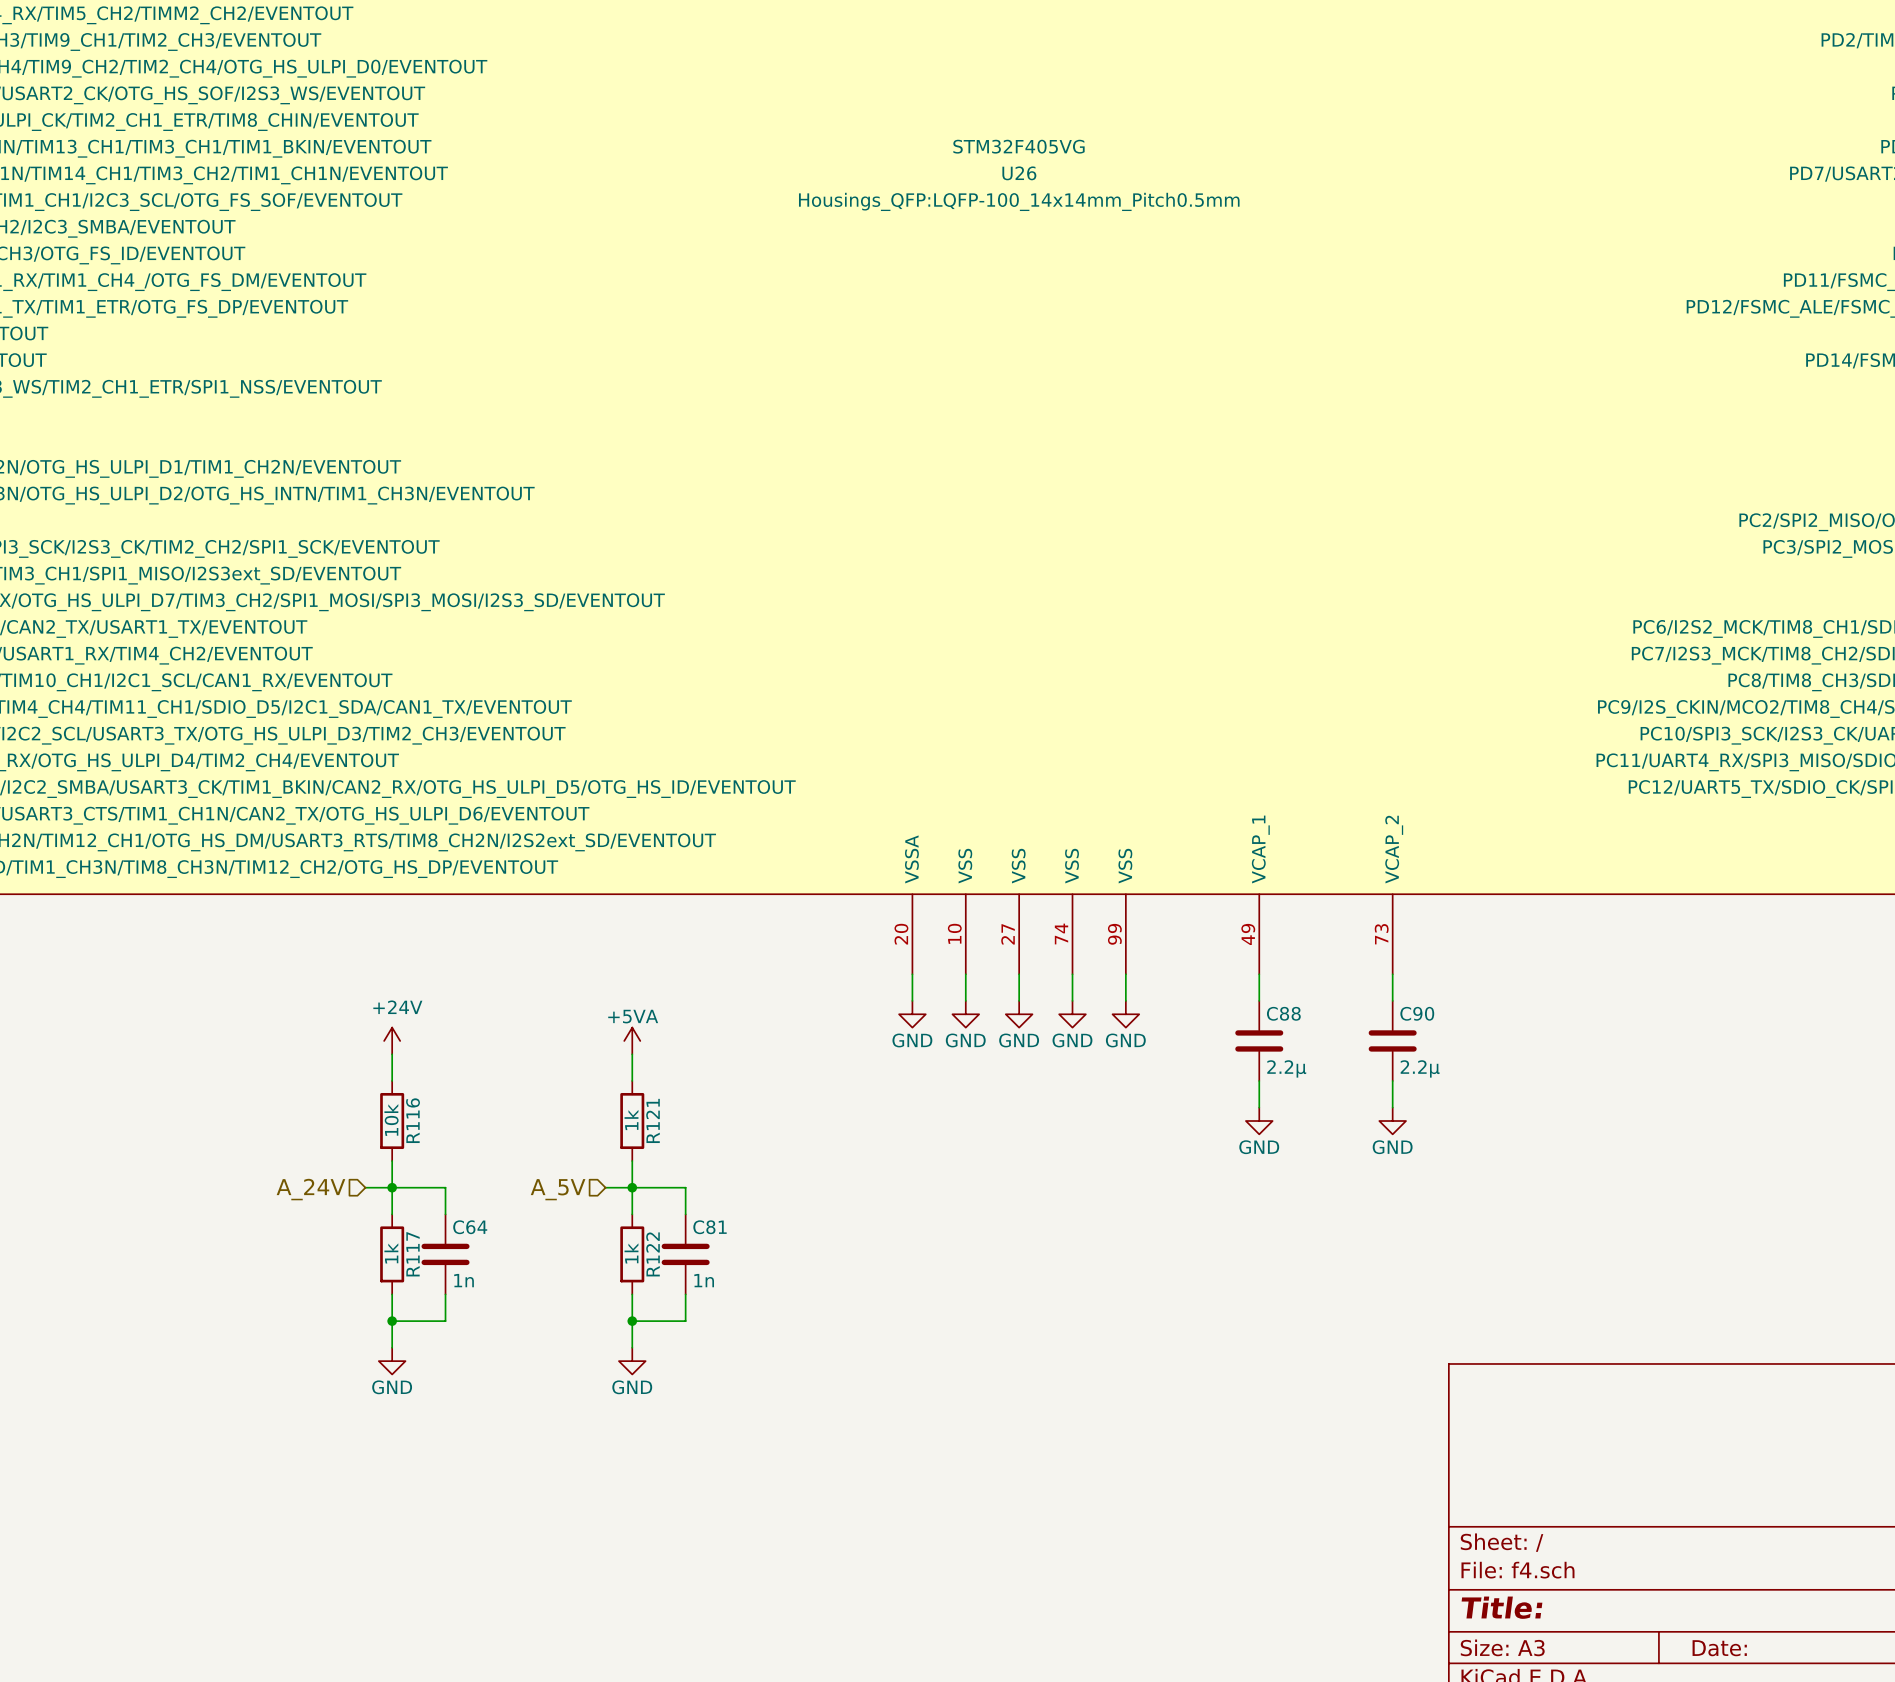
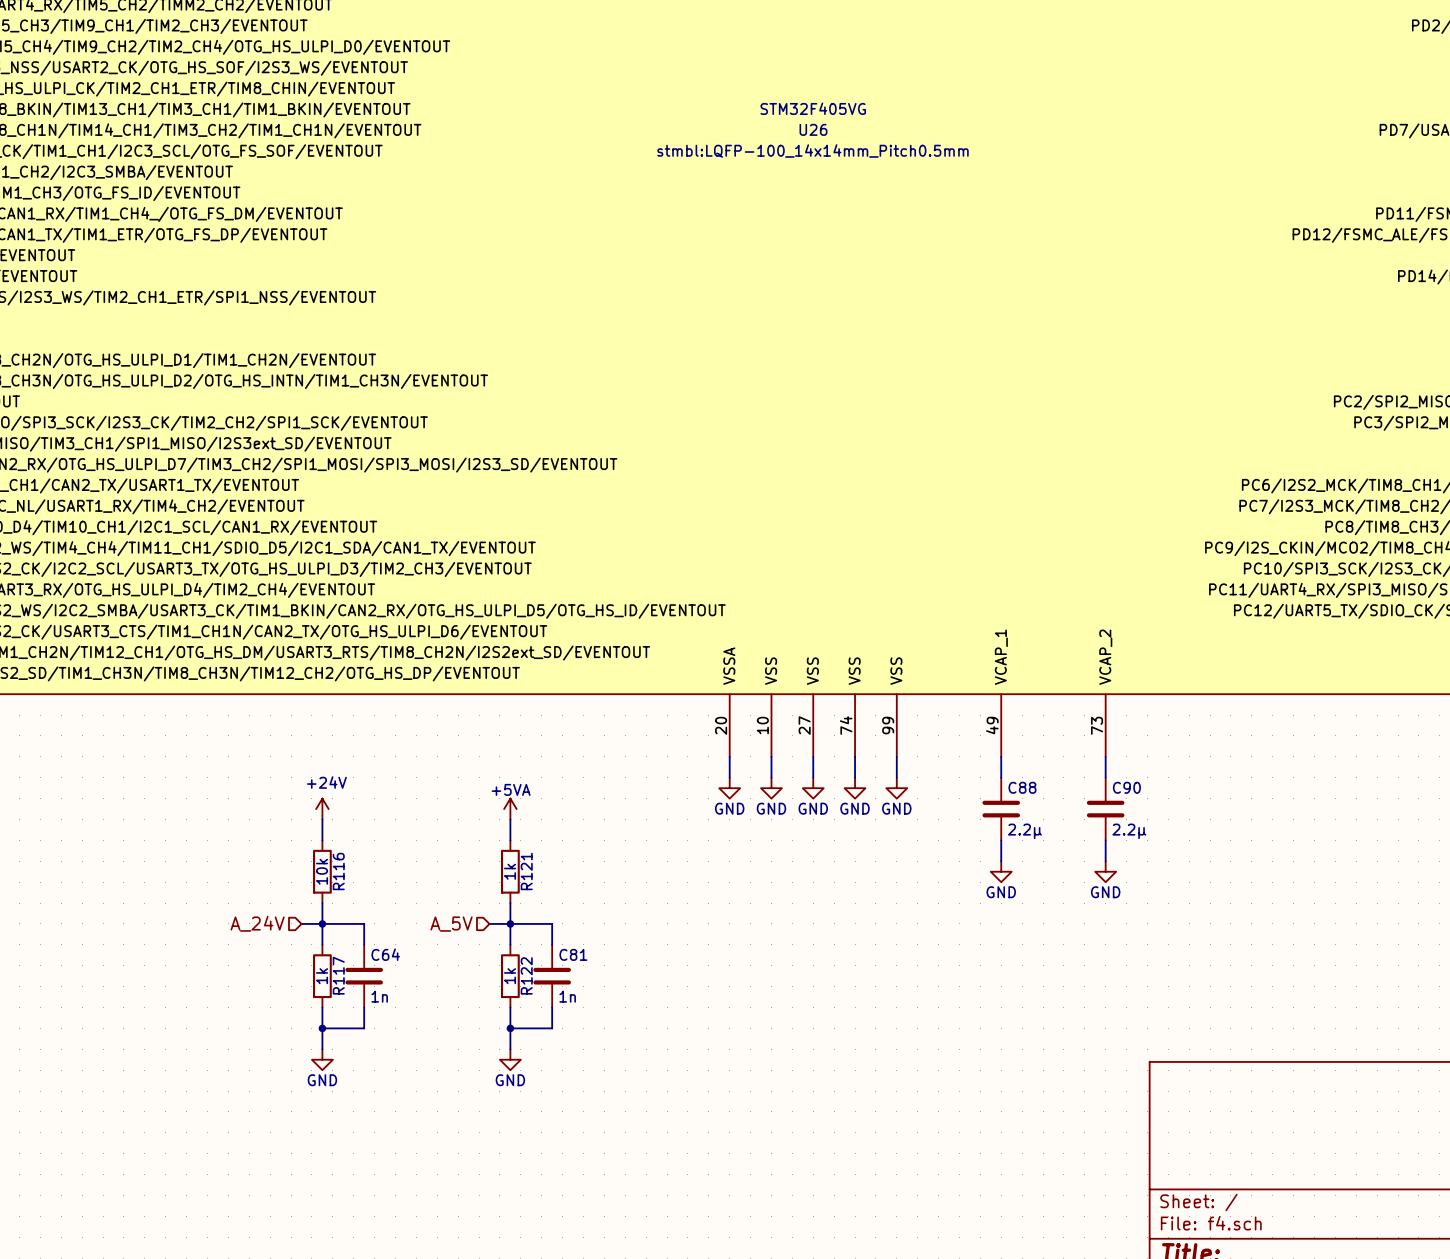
U26 text: Housings_QFP:LQFP-100_14x14mm_Pitch0.5mm (1019, 201) -> stmbl:LQFP-100_14x14mm_Pitch0.5mm (813, 151)

